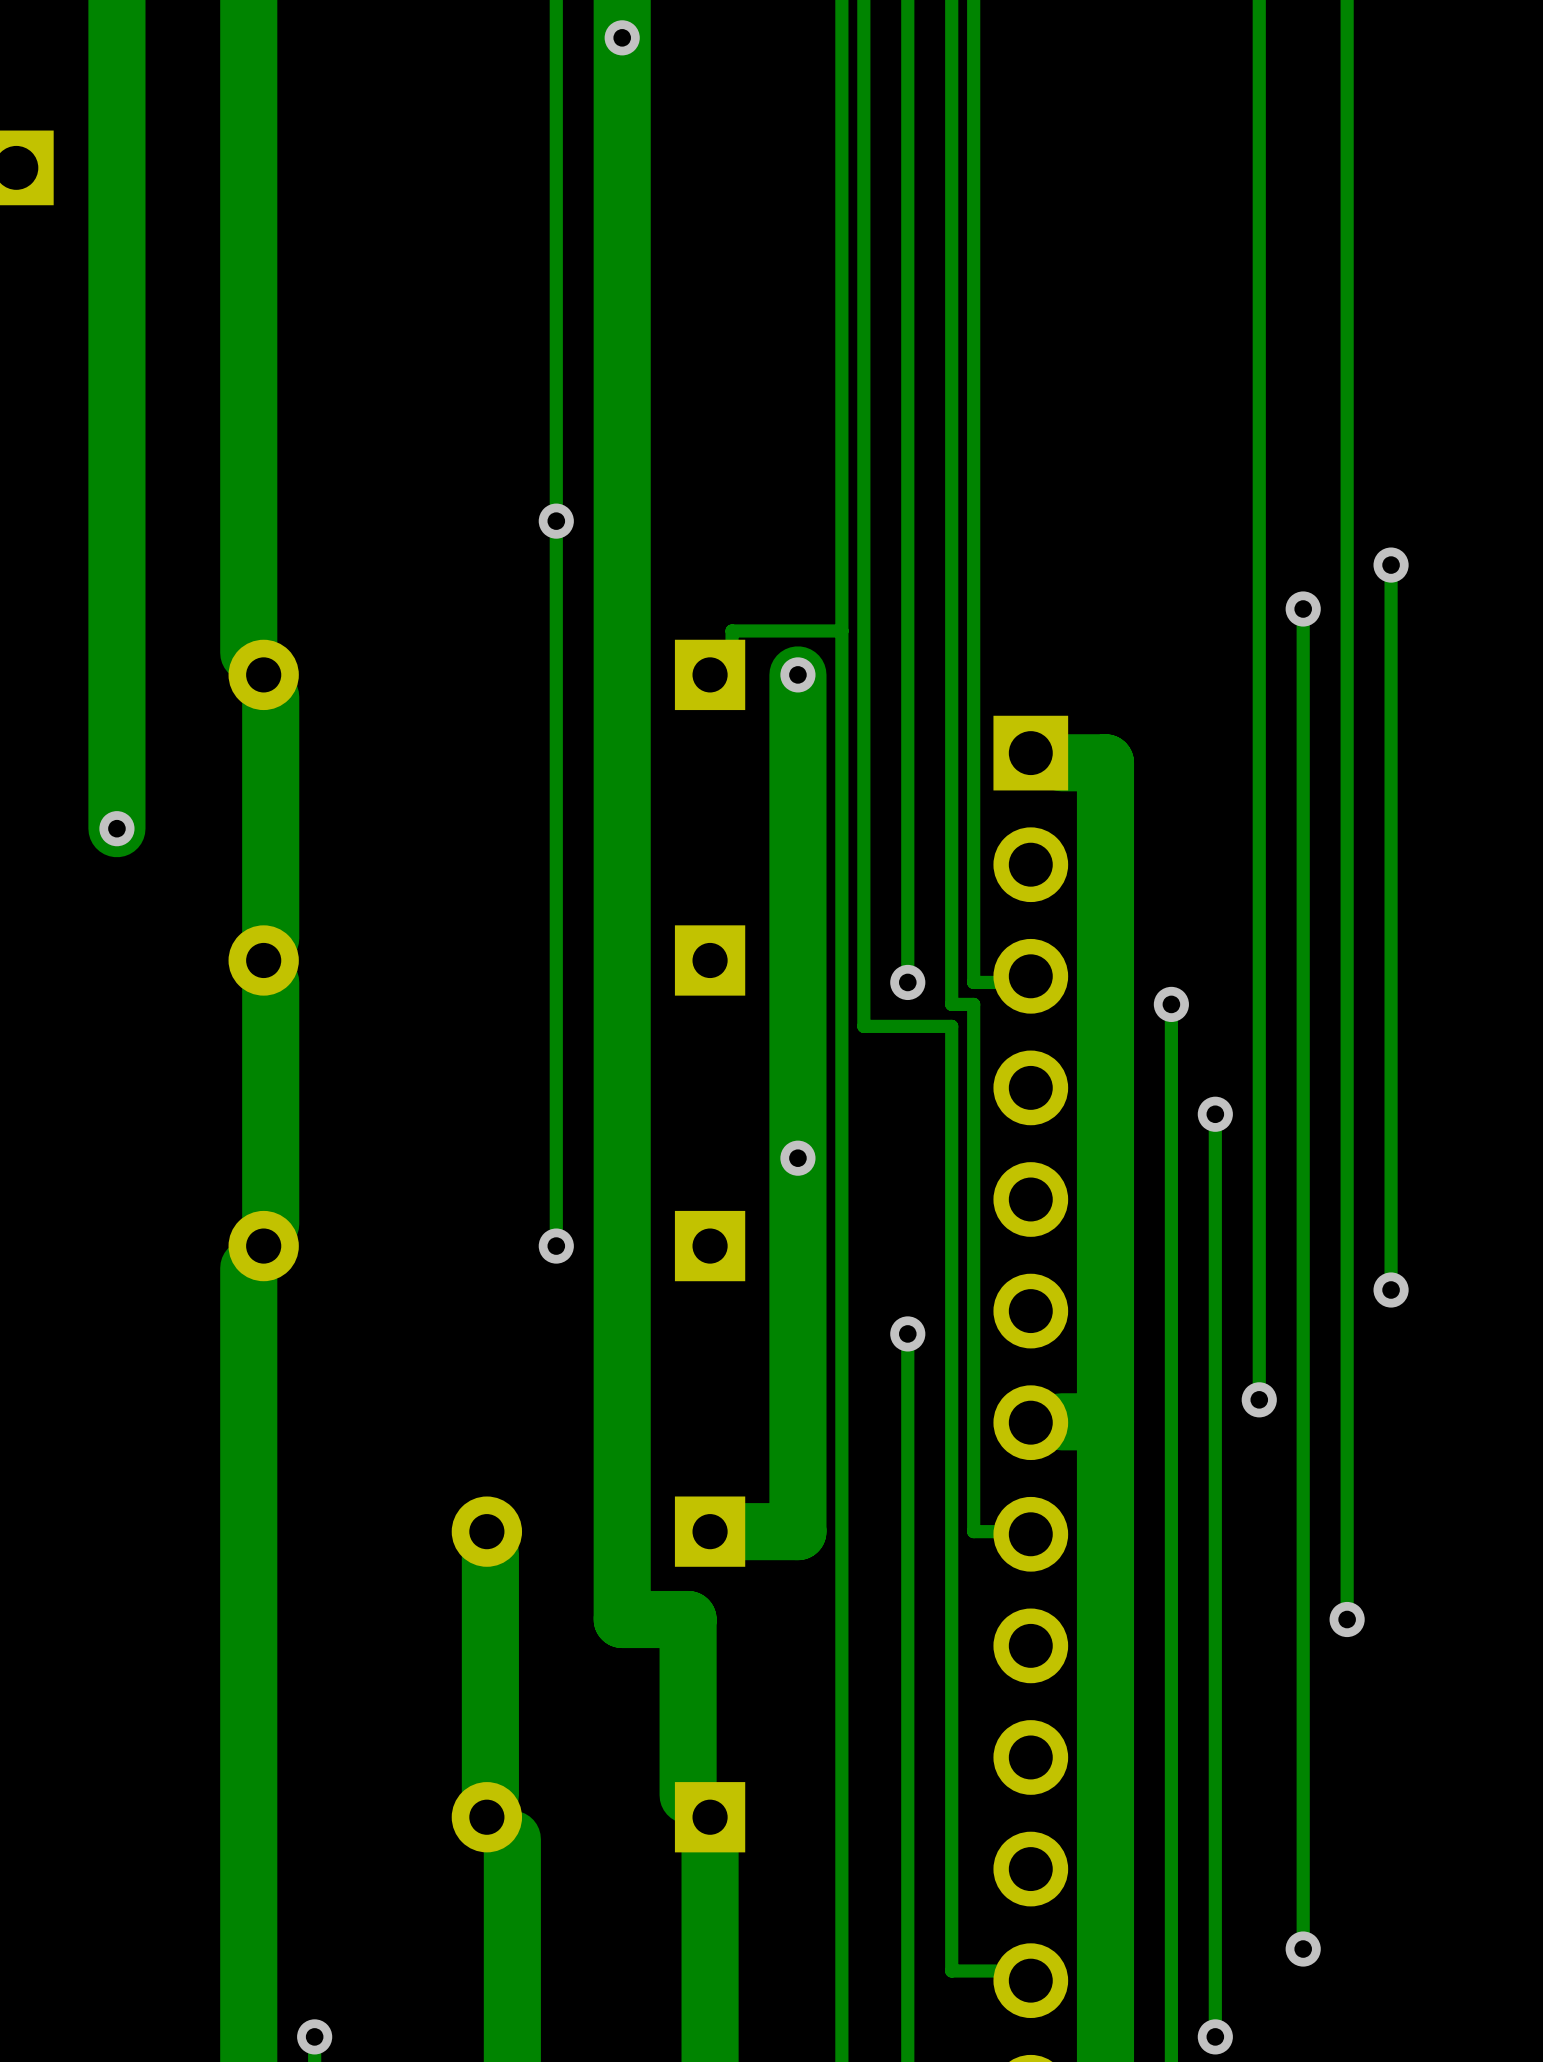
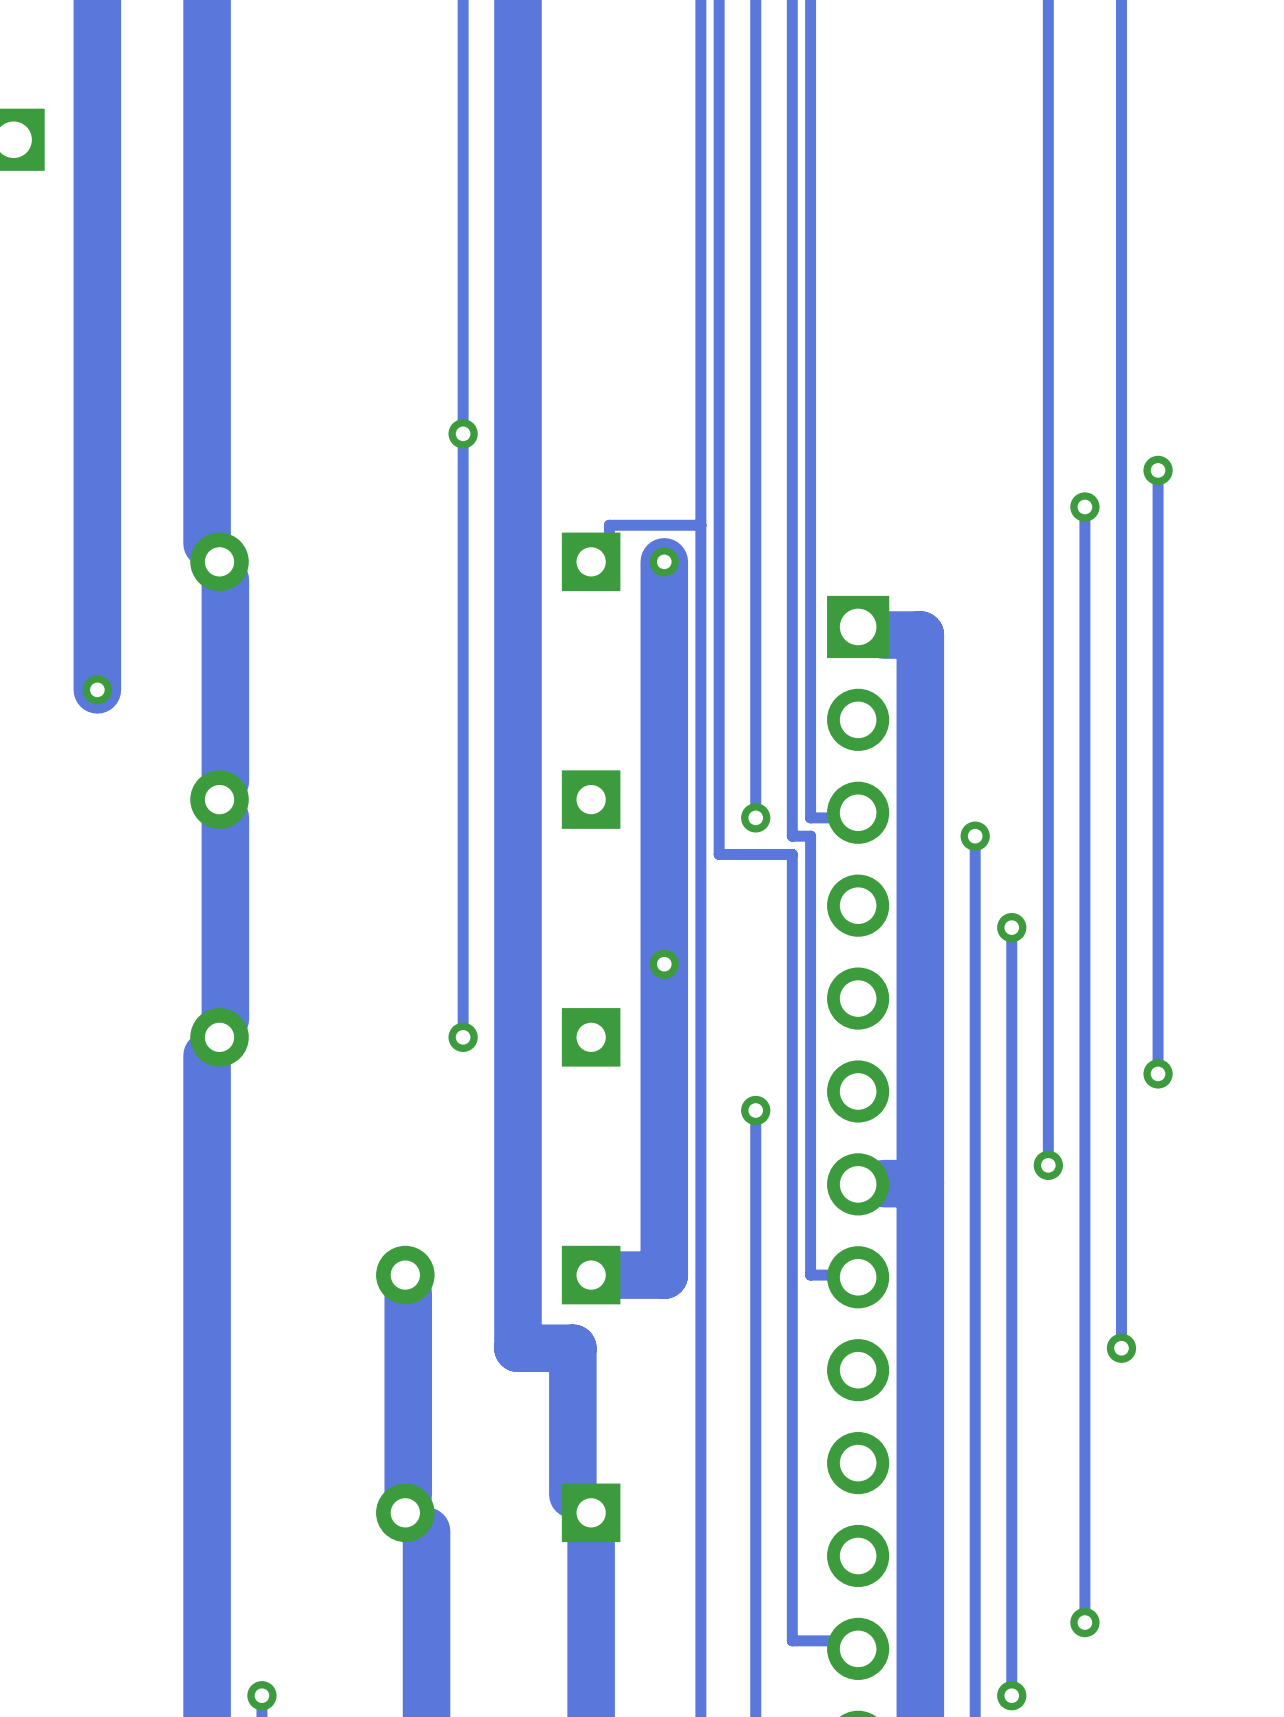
via: (622, 37) -> none

